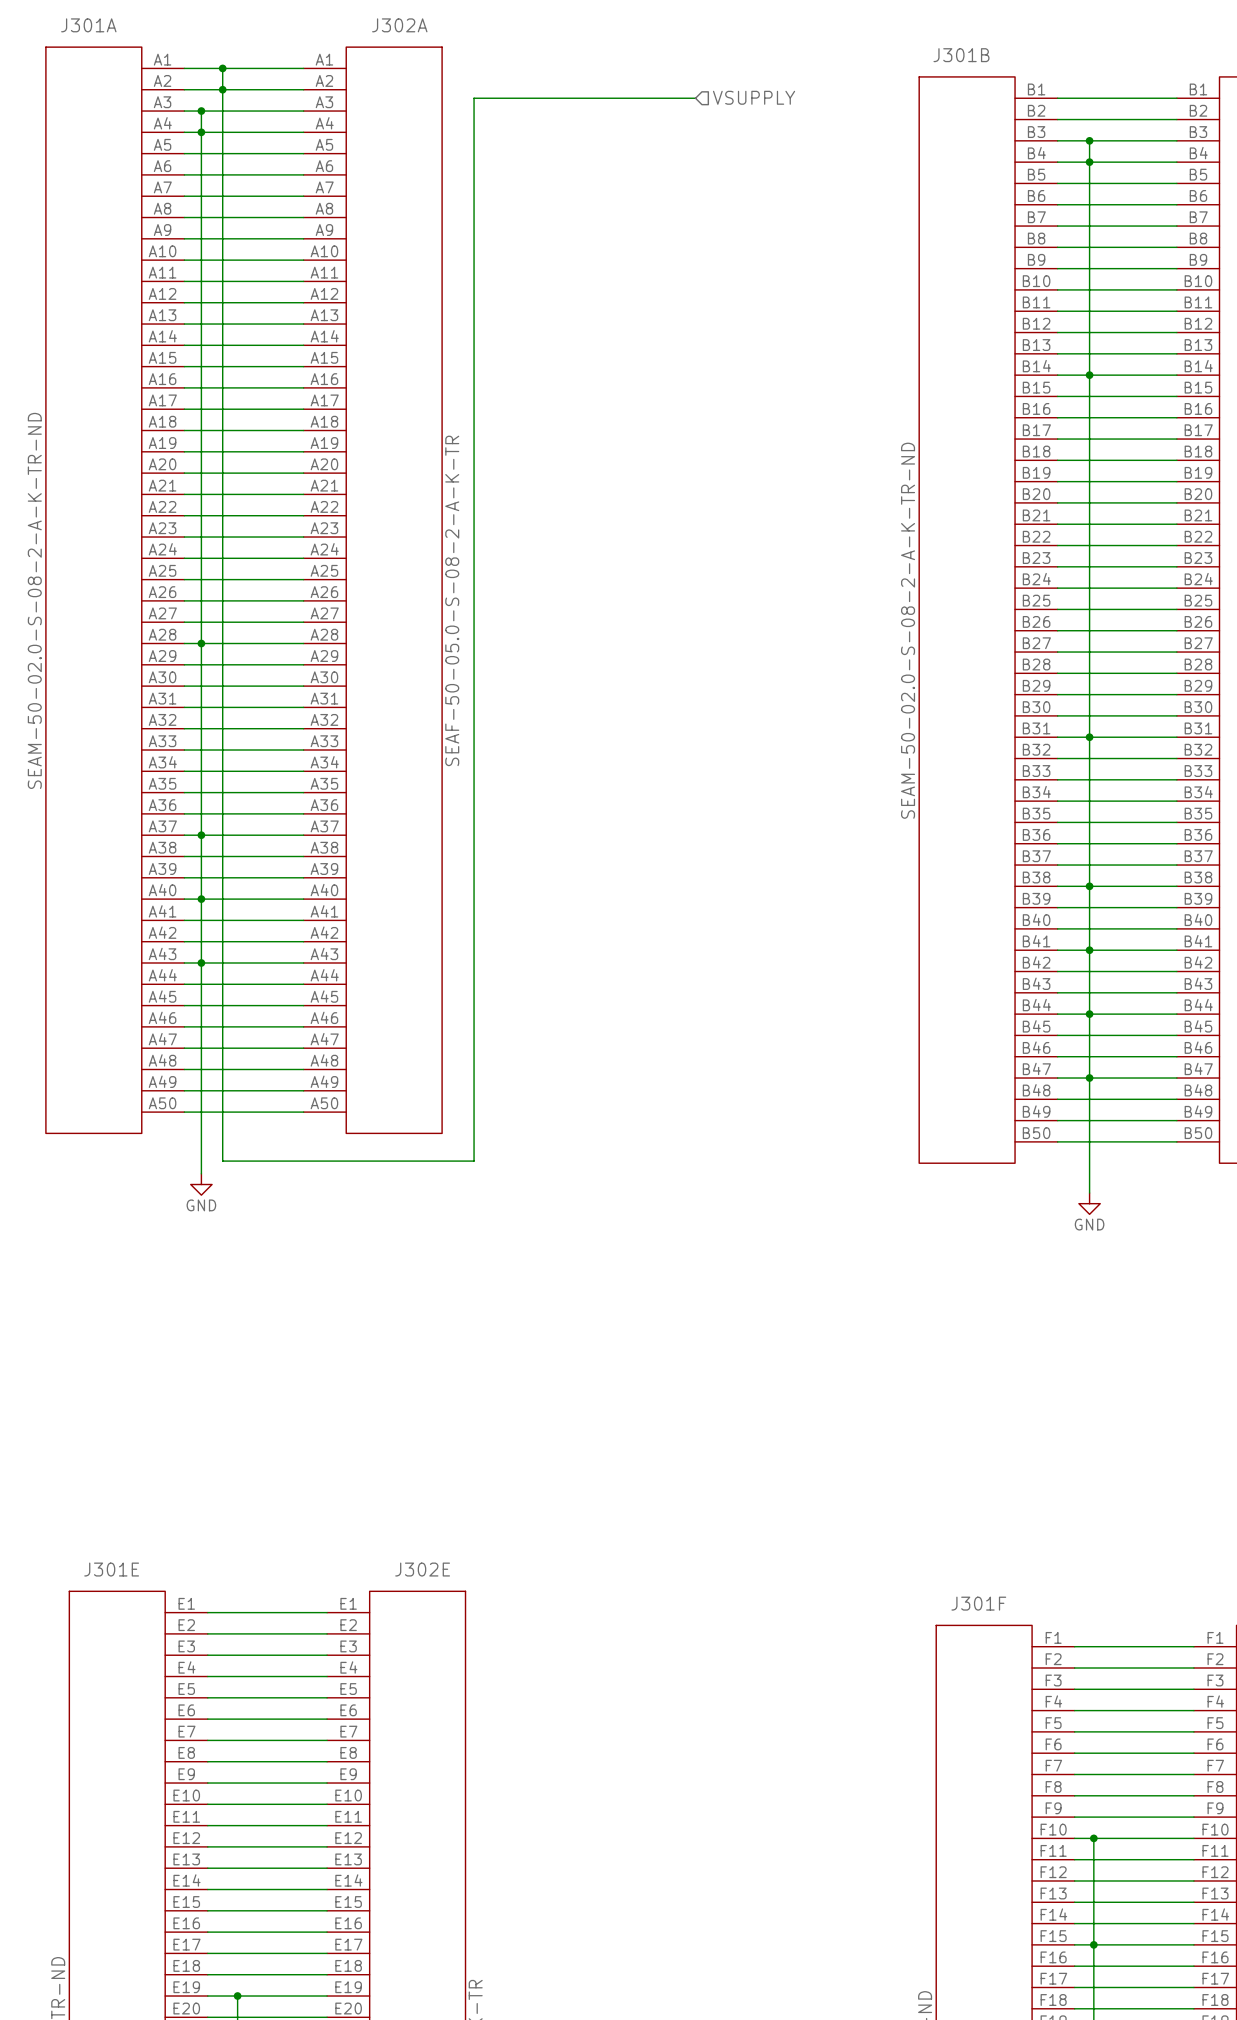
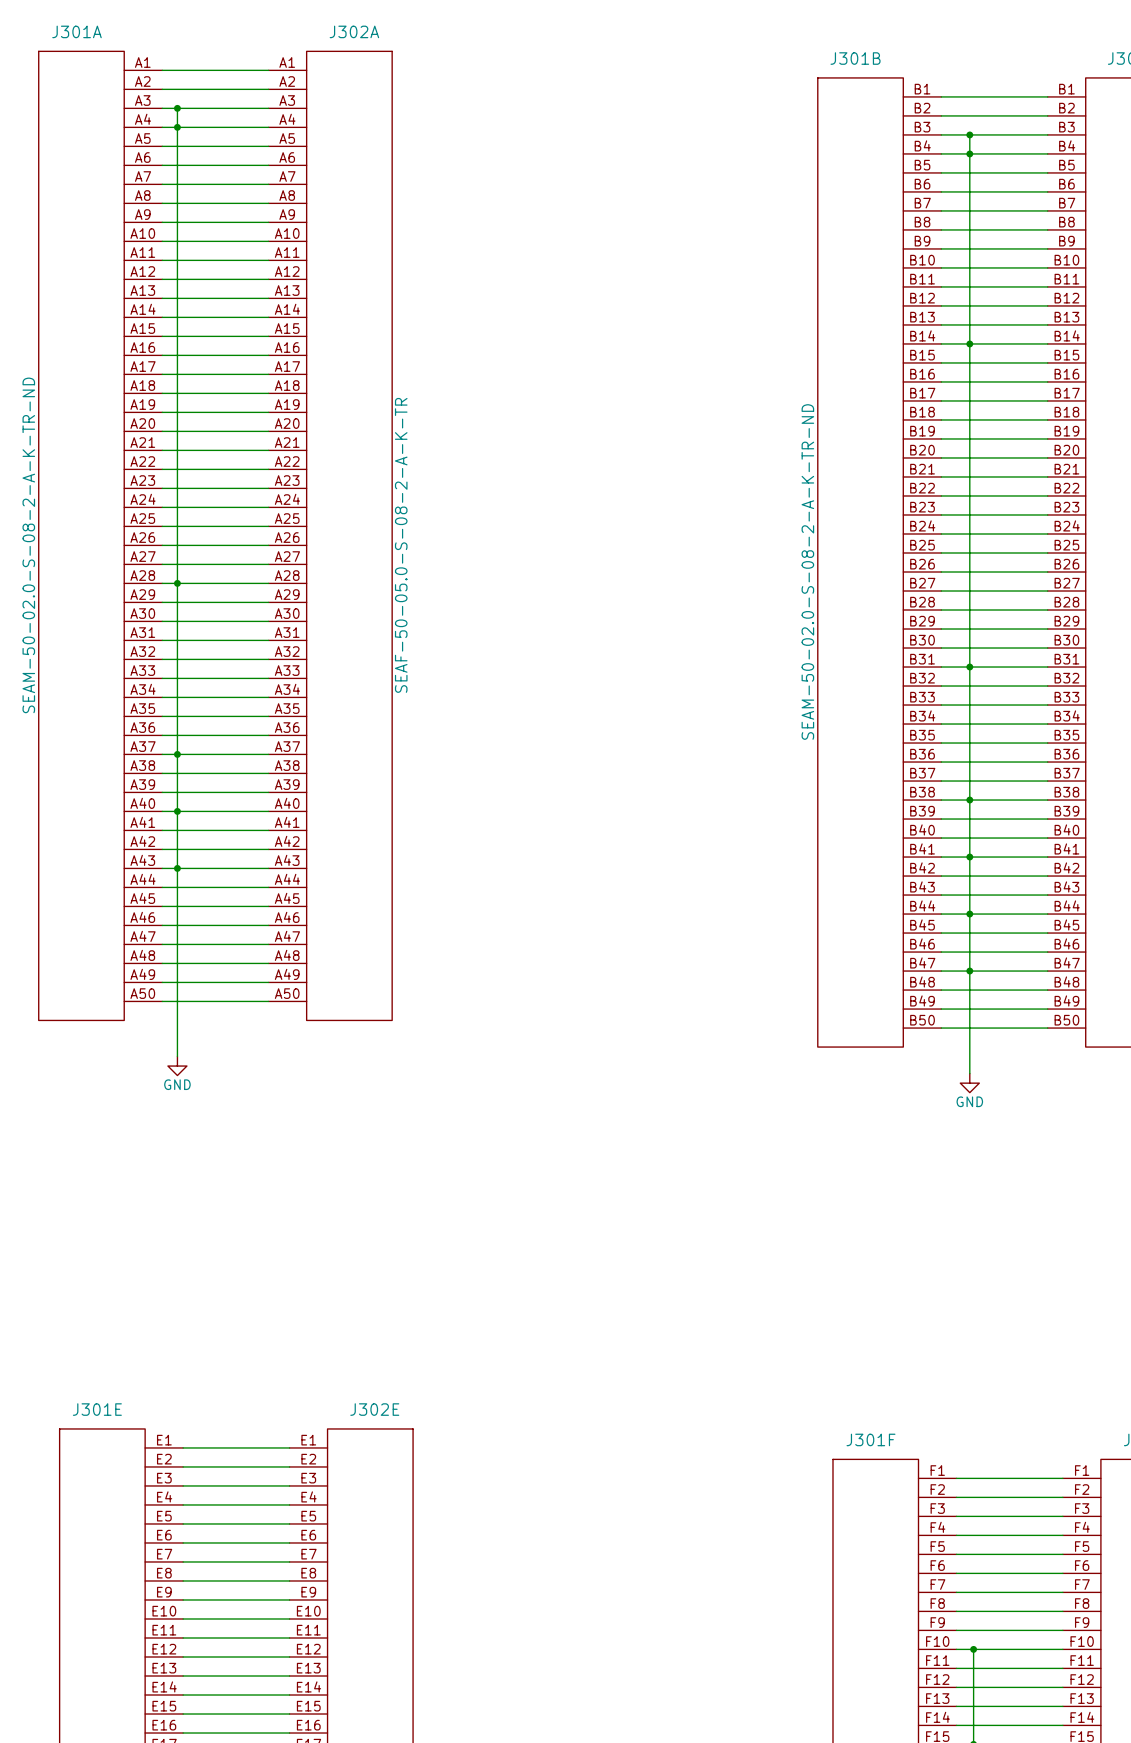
wire: (222, 68) (222, 1161) (474, 1161) (474, 98) (695, 98) -> none
junction: (222, 68) -> none
junction: (222, 89) -> none
hierarchical label: VSUPPLY (754, 97) -> none

